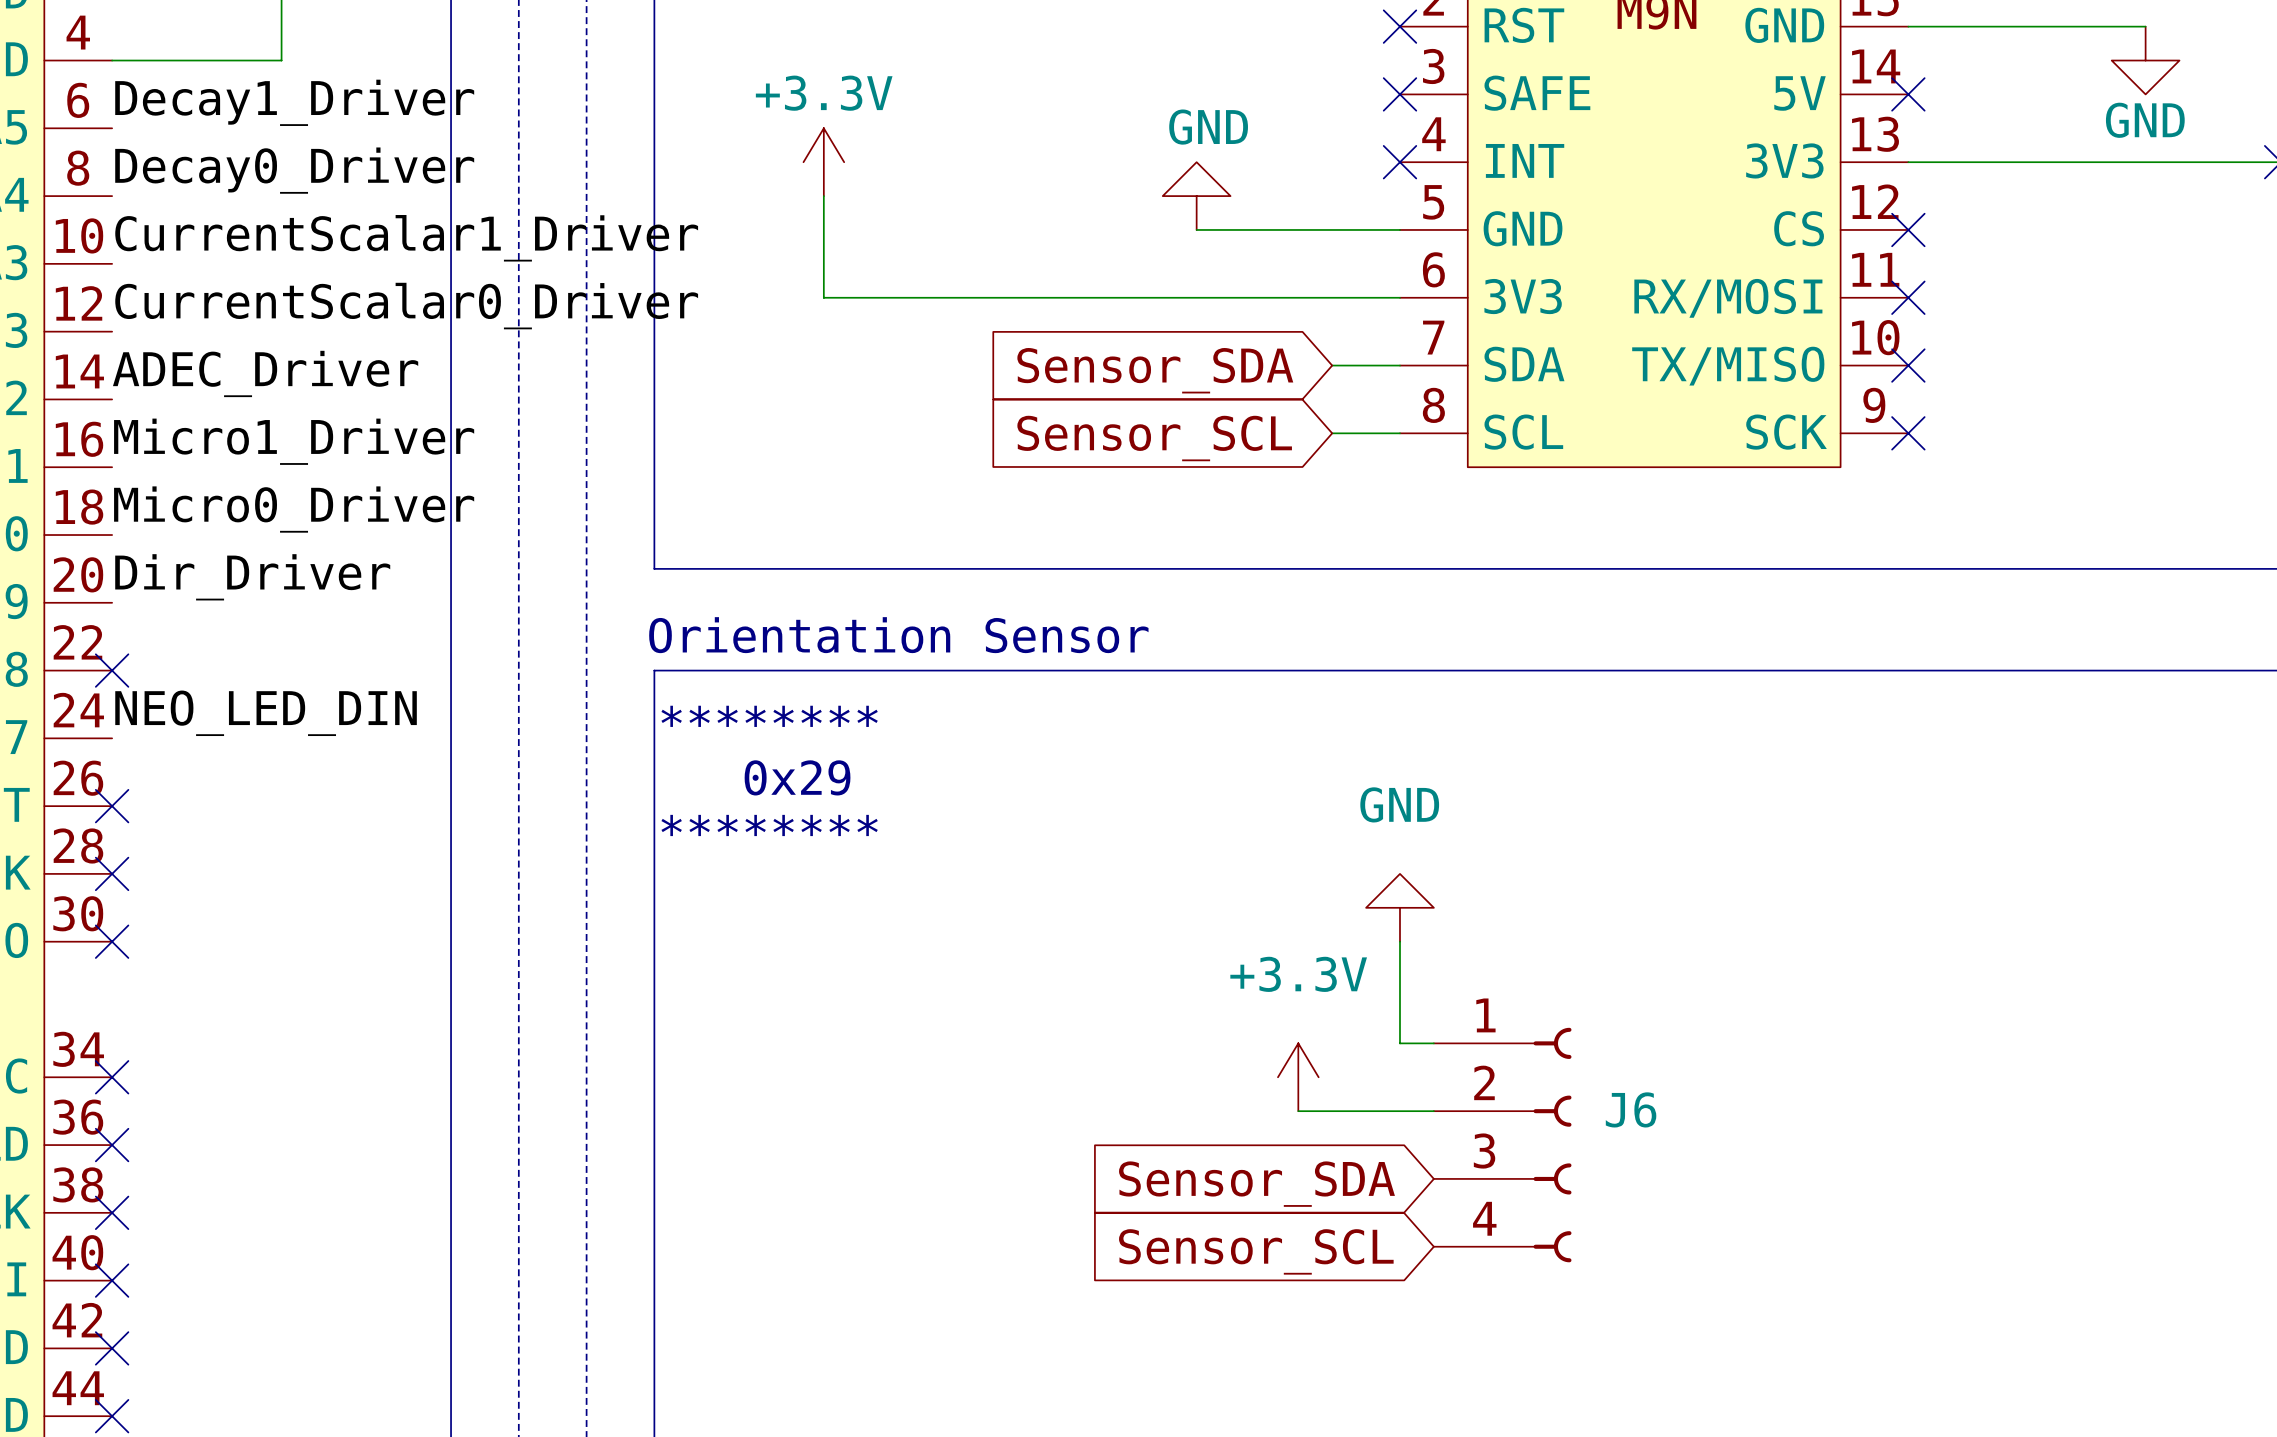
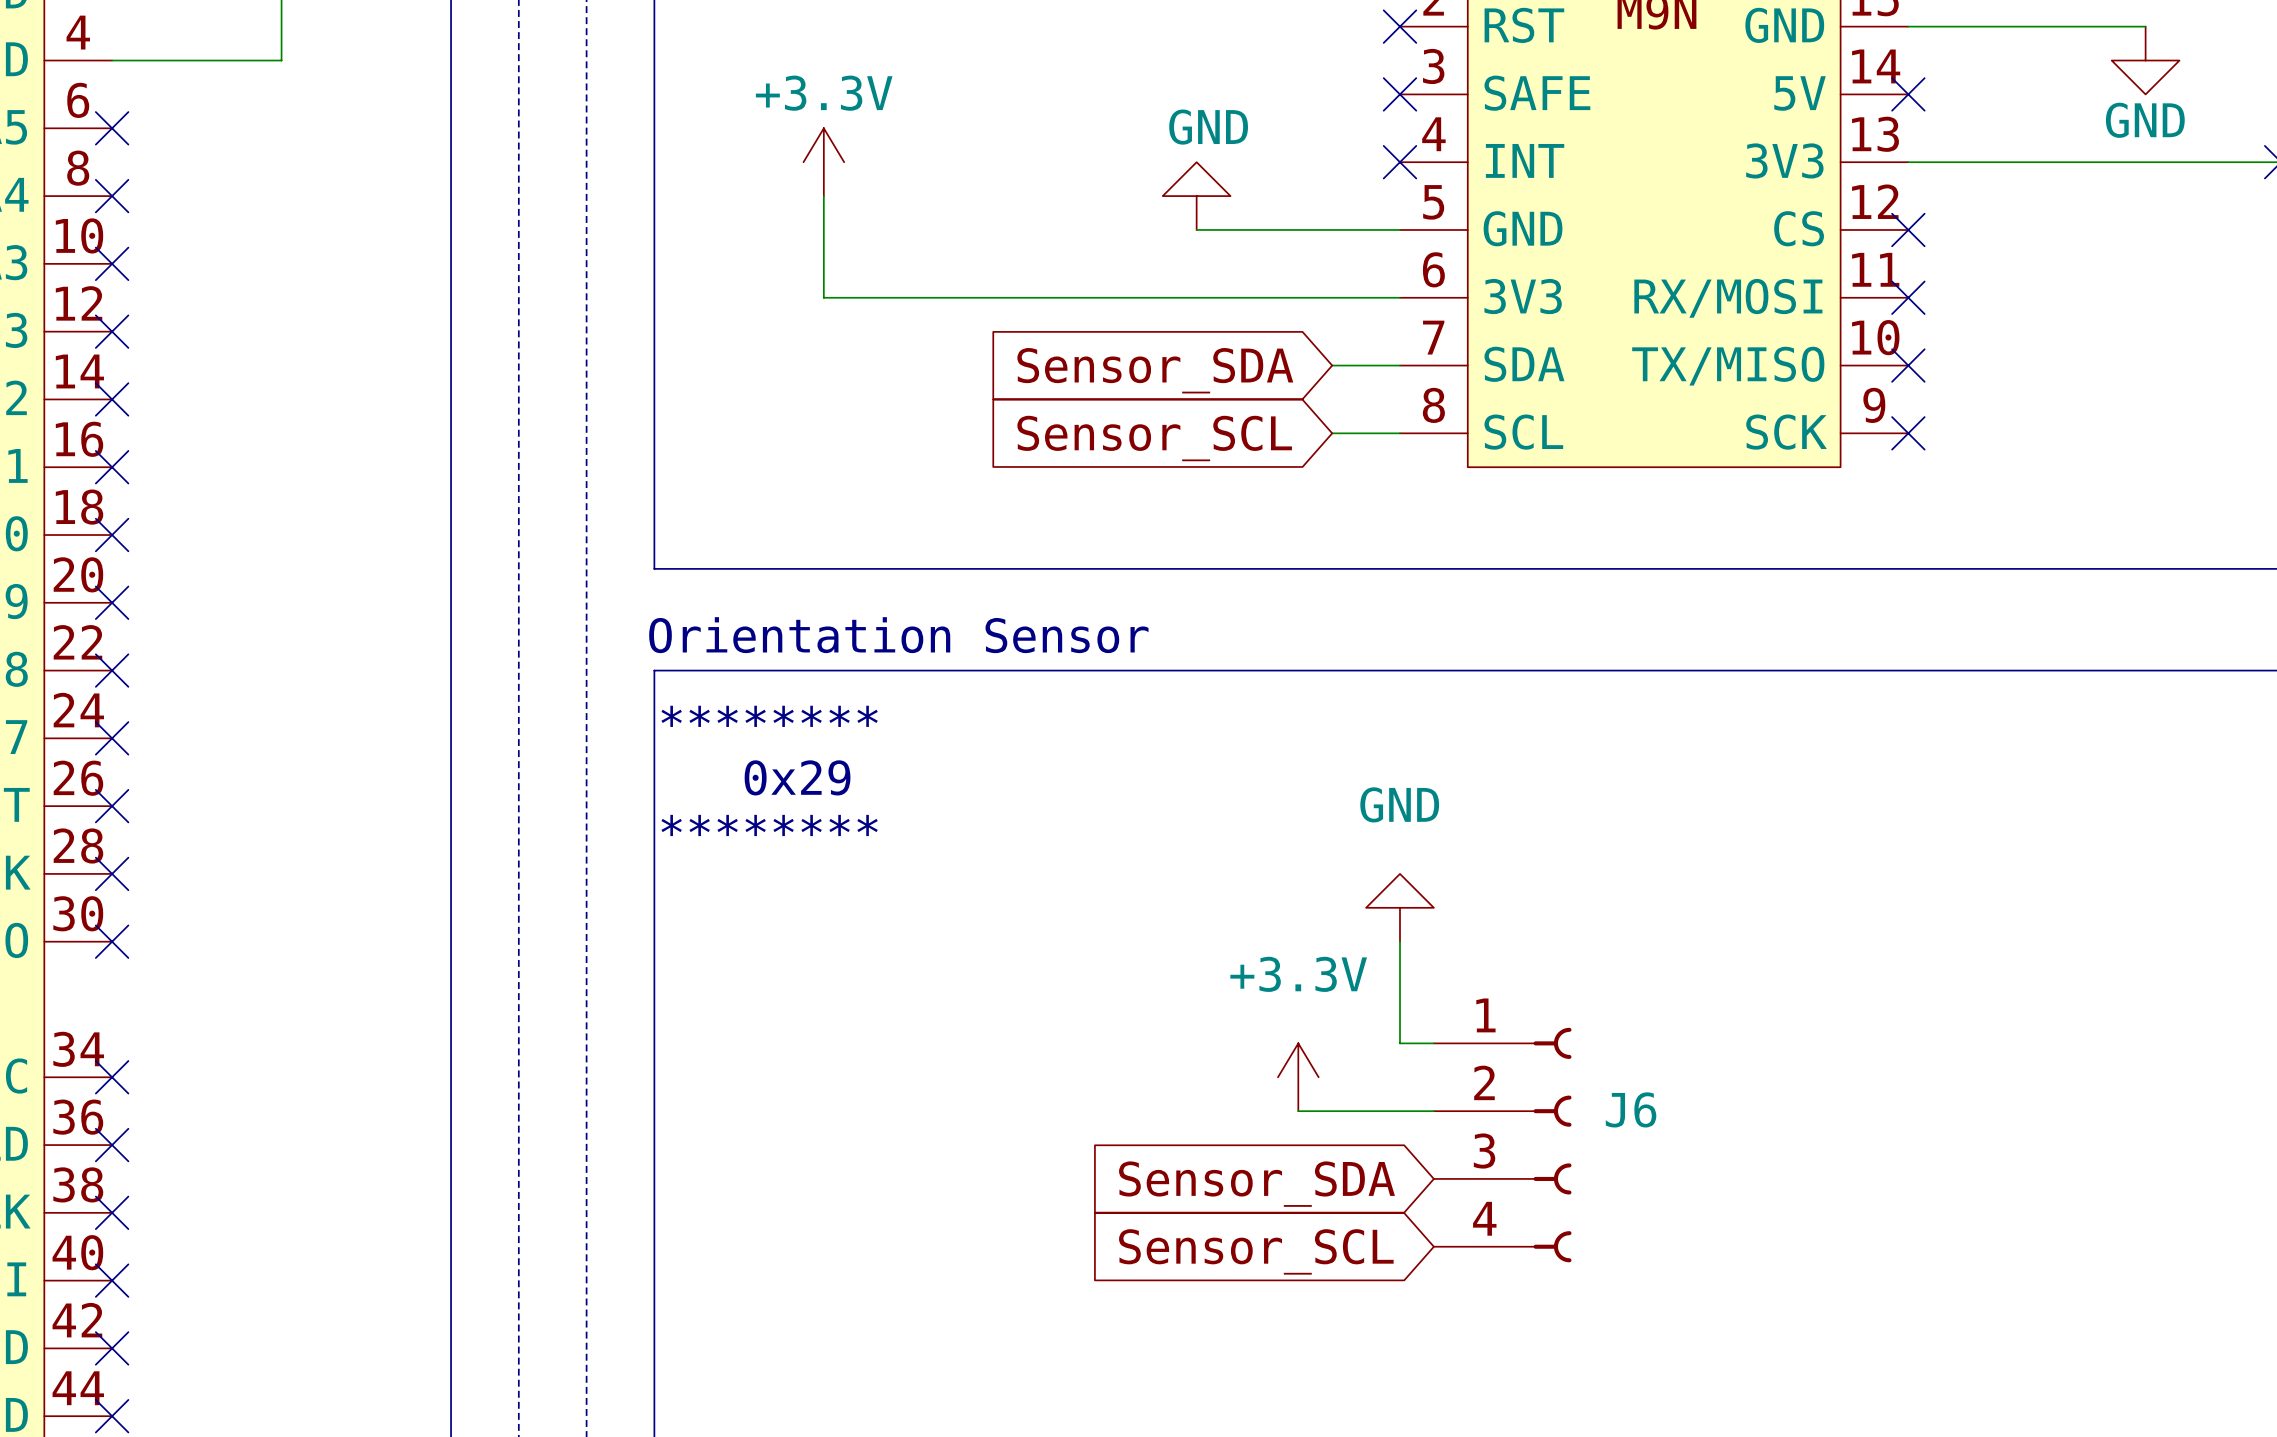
label: Decay1_Driver (294, 102) -> none
no-connect mark: none -> (112, 128)
label: Decay0_Driver (294, 170) -> none
no-connect mark: none -> (112, 196)
label: CurrentScalar1_Driver (406, 238) -> none
no-connect mark: none -> (112, 263)
label: CurrentScalar0_Driver (406, 306) -> none
no-connect mark: none -> (112, 331)
label: ADEC_Driver (265, 373) -> none
no-connect mark: none -> (112, 399)
label: Micro1_Driver (294, 441) -> none
no-connect mark: none -> (112, 467)
label: Micro0_Driver (294, 509) -> none
no-connect mark: none -> (112, 535)
label: Dir_Driver (252, 577) -> none
no-connect mark: none -> (112, 602)
label: NEO_LED_DIN (266, 713) -> none
no-connect mark: none -> (112, 738)

